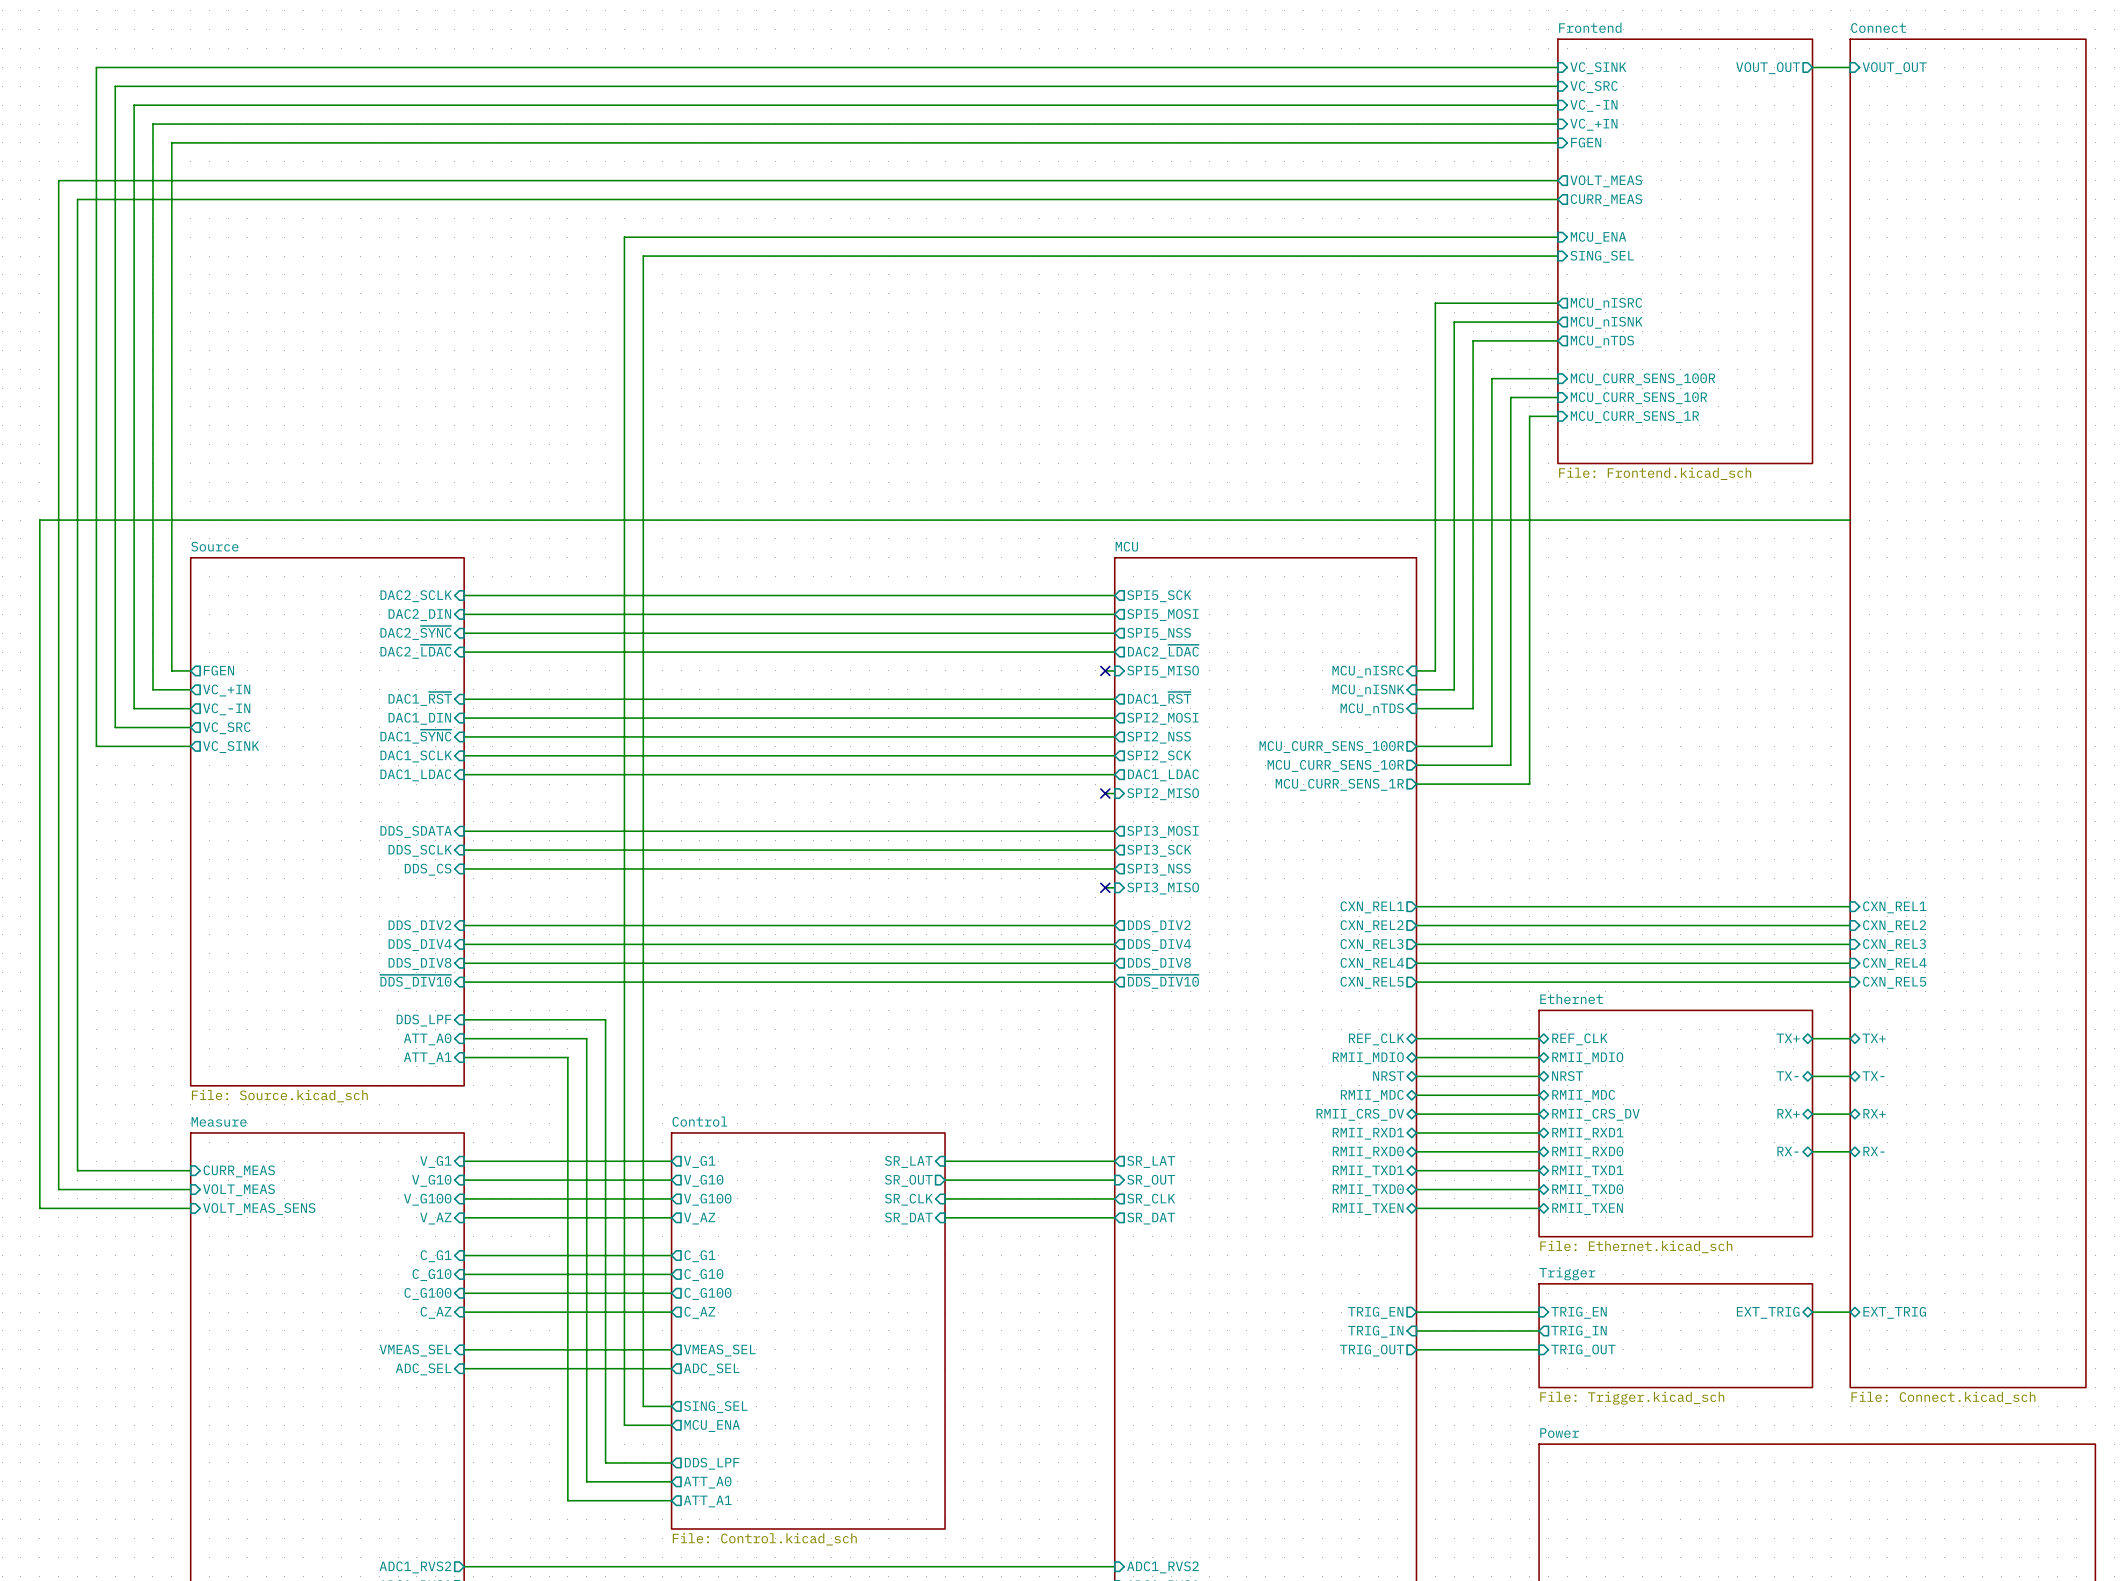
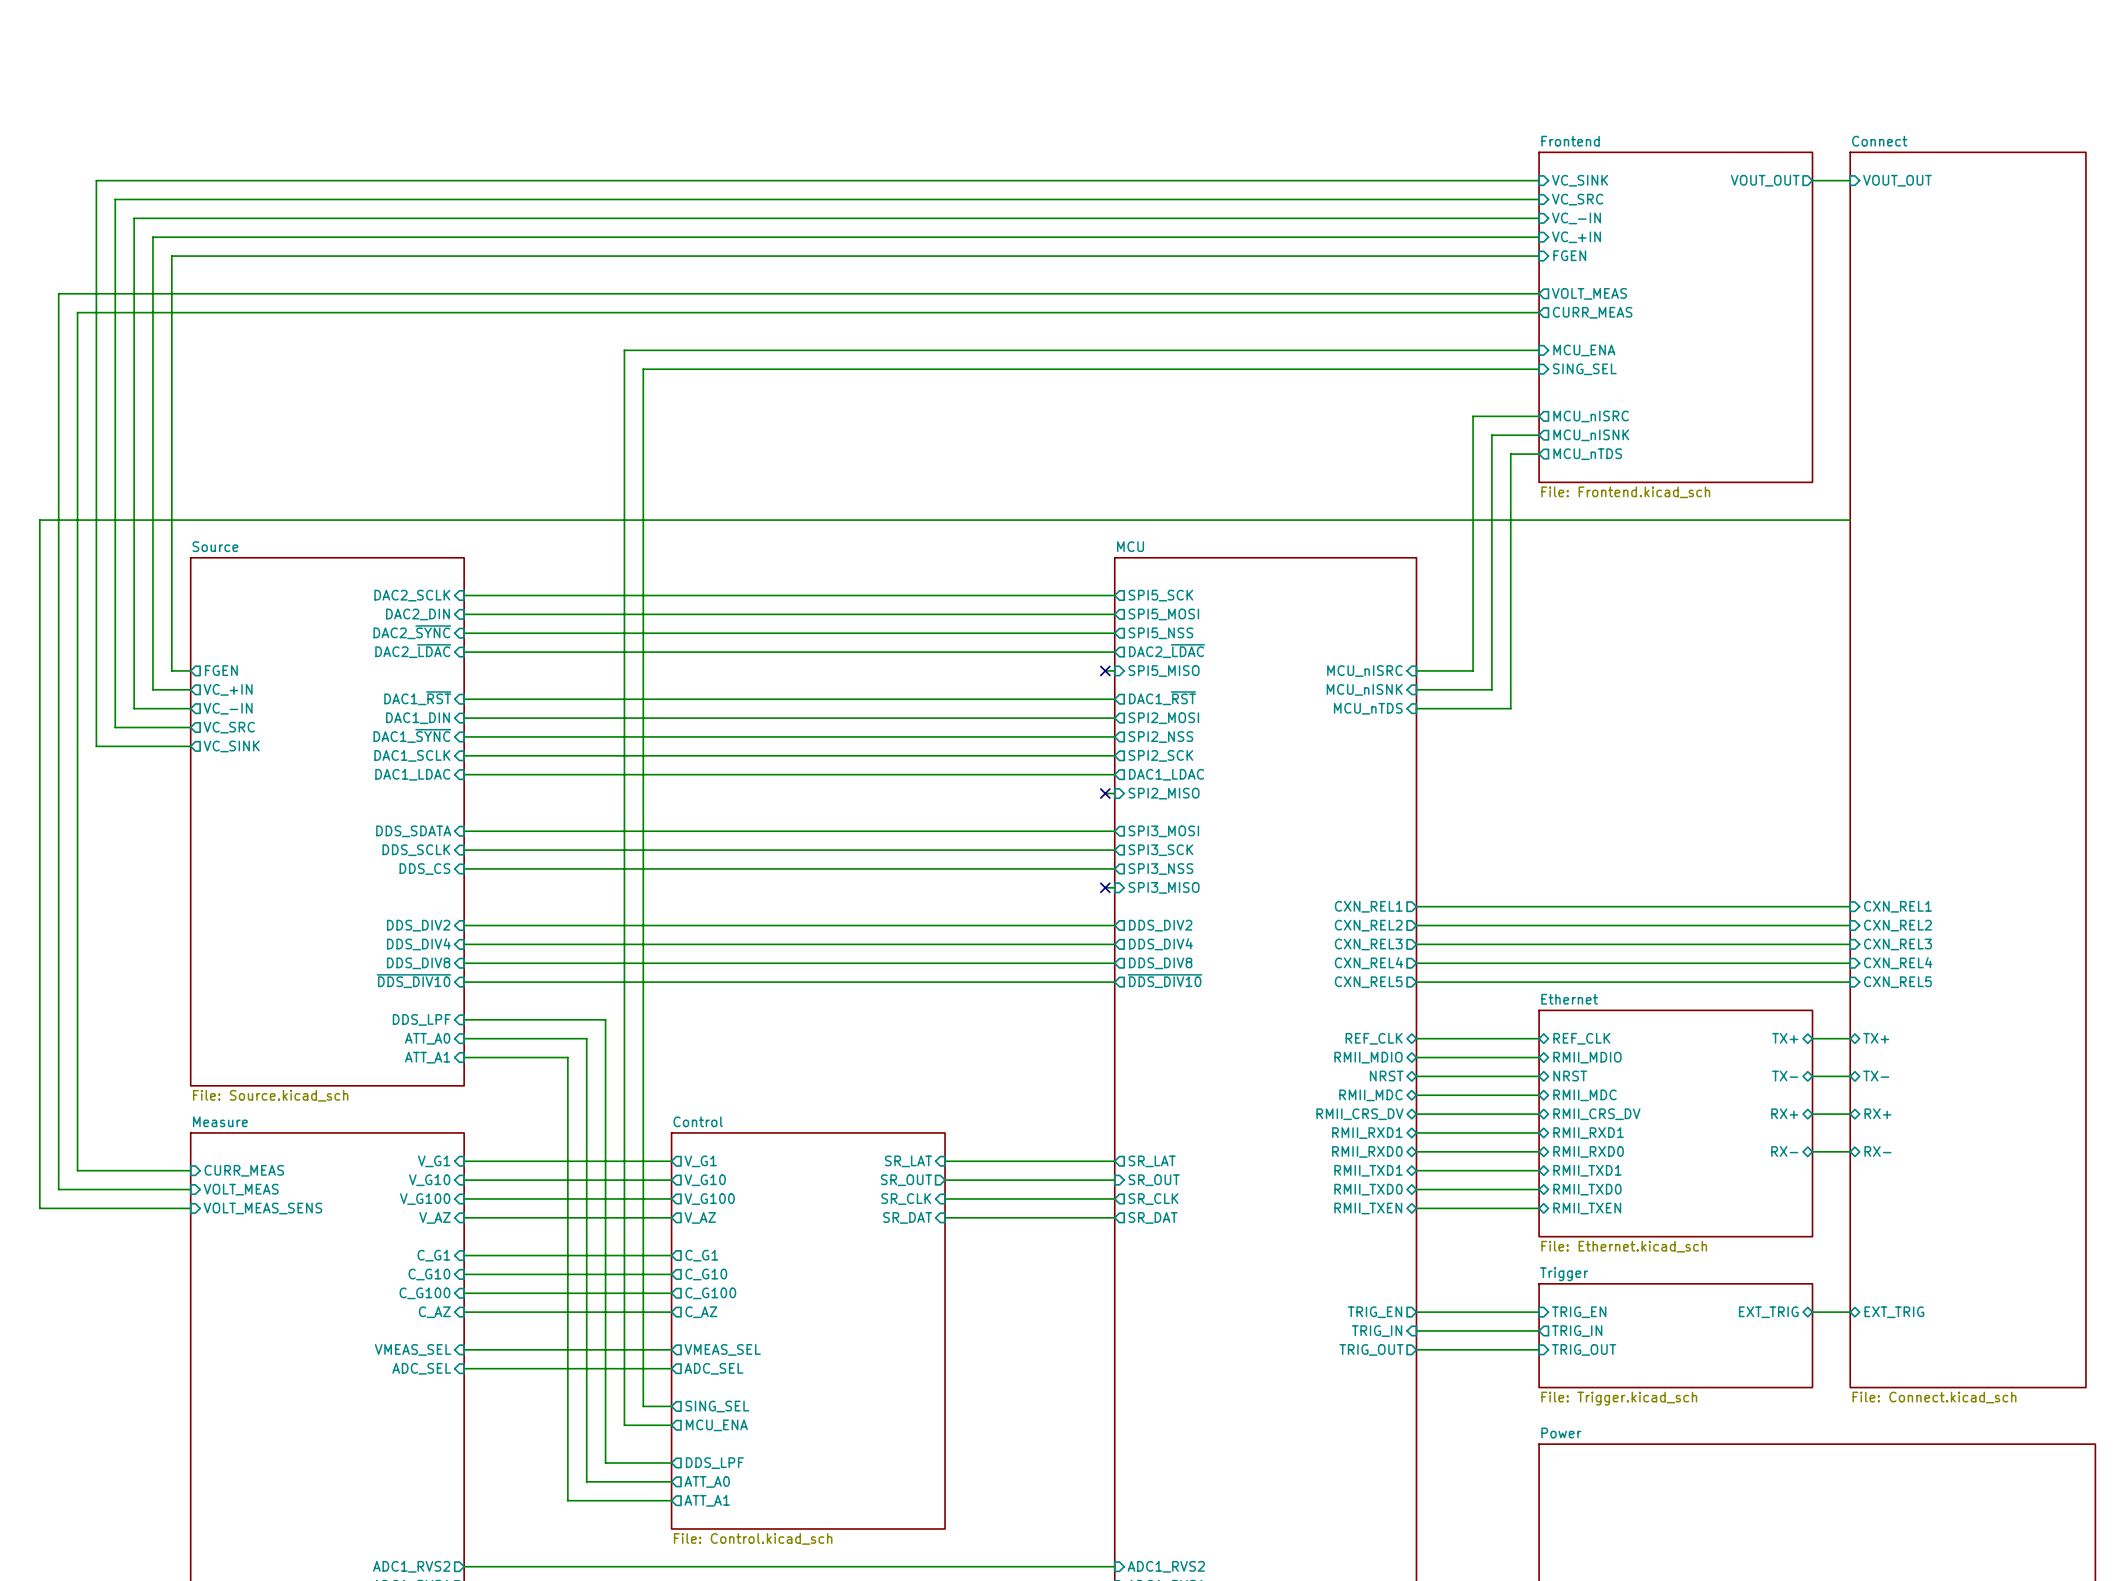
wire: (1557, 67) (96, 67) (96, 180) (58, 180) (58, 293) -> (1539, 293) (58, 293)
wire: (1812, 67) (1850, 67) -> (1812, 180) (1850, 180)
sheet pin position: VC_SINK (1598, 68) -> VC_SINK (1580, 180)
sheet pin: VOUT_OUT (1768, 68) -> none
sheet pin: VOUT_OUT (1894, 68) -> none
wire: (1557, 86) (115, 86) (115, 199) (77, 199) (77, 312) -> (1539, 312) (77, 312)
sheet pin position: VC_SRC (1594, 87) -> VC_SRC (1577, 199)
wire: (1557, 105) (134, 105) (134, 218) -> (1539, 218) (134, 218)
sheet pin position: VC_-IN (1593, 105) -> VC_-IN (1576, 218)
wire: (1557, 124) (152, 124) (152, 237) -> none
sheet pin position: VC_+IN (1593, 124) -> VC_+IN (1576, 237)
wire: (1557, 142) (171, 142) (171, 256) -> none
sheet pin position: FGEN (1586, 142) -> FGEN (1569, 255)
wire: (1539, 180) (1557, 180) -> none
sheet pin position: VOLT_MEAS (1606, 181) -> VOLT_MEAS (1589, 293)
sheet pin: none -> VOUT_OUT (1765, 180)
sheet pin: none -> VOUT_OUT (1897, 180)
wire: (1539, 199) (1557, 199) -> none
sheet pin position: CURR_MEAS (1606, 200) -> CURR_MEAS (1592, 312)
wire: (624, 237) (624, 350) -> (624, 237) (152, 237)
wire: (1539, 237) (1557, 237) -> none
sheet pin position: MCU_ENA (1598, 237) -> MCU_ENA (1584, 350)
sheet Frontend: File: Frontend.kicad_sch (1685, 251) -> none
wire: (643, 256) (643, 369) -> (643, 256) (171, 256)
wire: (1539, 256) (1557, 256) -> none
sheet pin position: SING_SEL (1602, 256) -> SING_SEL (1584, 369)
wire: (1557, 303) (1435, 303) (1435, 670) -> none
sheet pin position: MCU_nISRC (1606, 303) -> MCU_nISRC (1591, 416)
sheet Frontend: none -> File: Frontend.kicad_sch (1675, 317)
wire: (1557, 322) (1454, 322) (1454, 689) -> none
sheet pin position: MCU_nISNK (1606, 322) -> MCU_nISNK (1591, 435)
wire: (1557, 340) (1473, 340) (1473, 416) -> (1529, 416) (1473, 416)
sheet pin position: MCU_nTDS (1602, 341) -> MCU_nTDS (1587, 454)
wire: none -> (624, 350) (1539, 350)
wire: none -> (643, 369) (1539, 369)
wire: (1557, 378) (1491, 378) (1491, 435) -> (1539, 435) (1491, 435)
sheet pin: MCU_CURR_SENS_100R (1642, 379) -> none
wire: (1557, 397) (1510, 397) (1510, 454) -> (1539, 454) (1510, 454)
sheet pin: MCU_CURR_SENS_10R (1638, 398) -> none
wire: (1529, 416) (1529, 784) (1416, 784) -> none
wire: (1539, 416) (1557, 416) -> none
sheet pin: MCU_CURR_SENS_1R (1634, 417) -> none
wire: (1473, 670) (1473, 708) -> (1473, 670) (1435, 670)
wire: (1491, 689) (1491, 746) (1416, 746) -> (1491, 689) (1454, 689)
wire: (1510, 708) (1510, 765) (1416, 765) -> (1510, 708) (1473, 708)
sheet Connect: File: Connect.kicad_sch (1968, 713) -> none
sheet pin: MCU_CURR_SENS_100R (1331, 747) -> none
sheet pin: MCU_CURR_SENS_10R (1335, 765) -> none
sheet Connect: none -> File: Connect.kicad_sch (1968, 769)
sheet pin: MCU_CURR_SENS_1R (1339, 784) -> none

